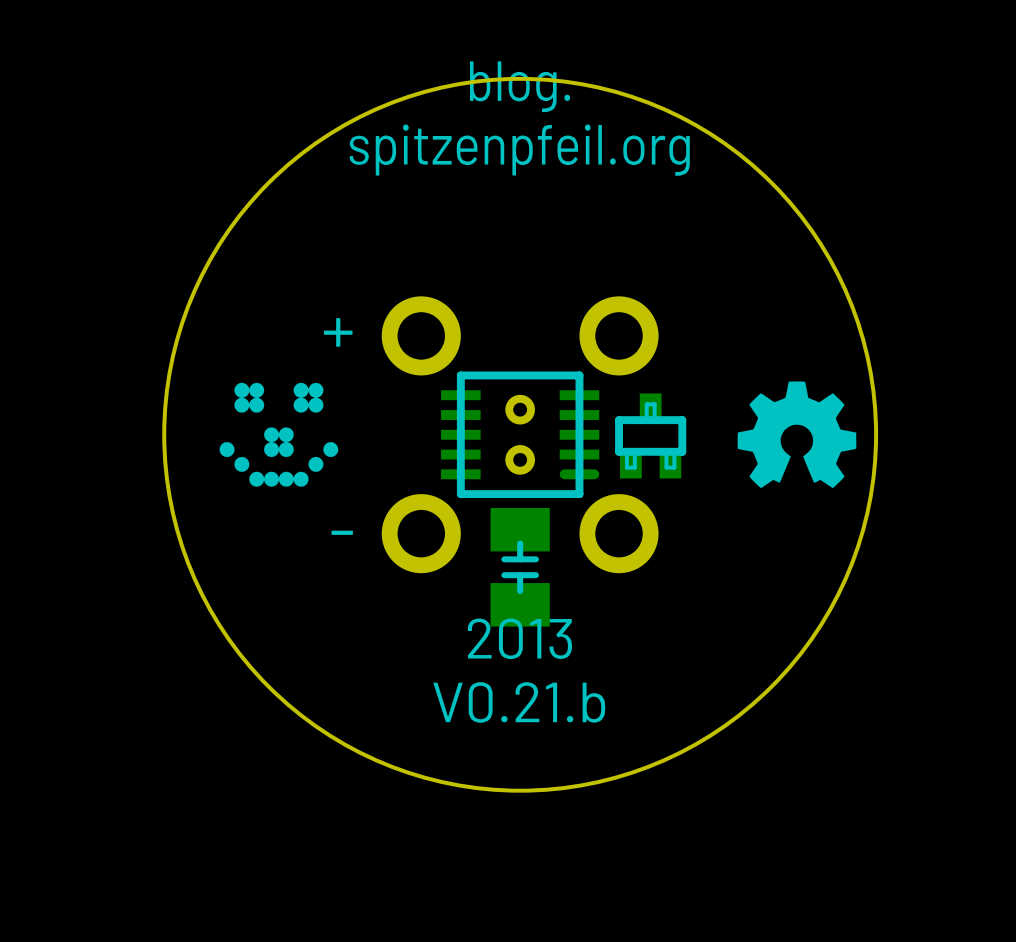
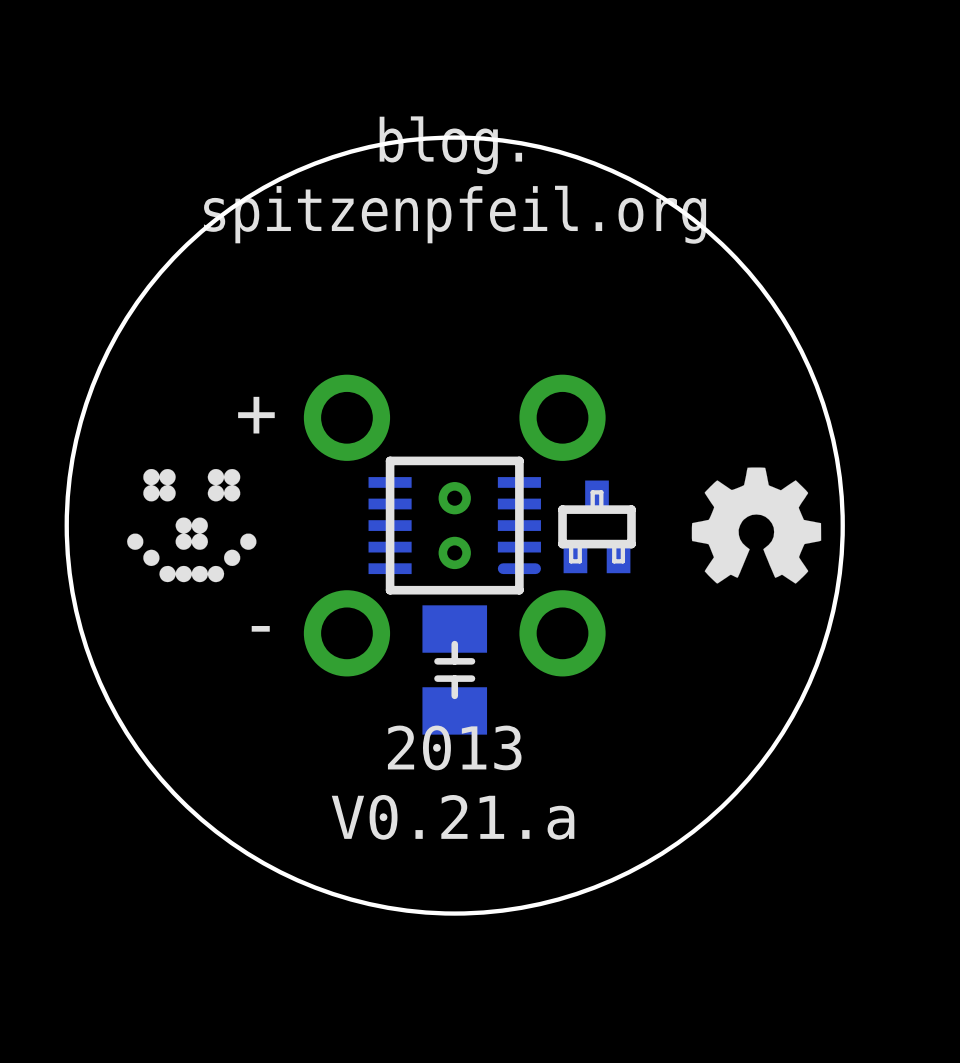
text: V0.21.b (519, 702) -> V0.21.a (453, 817)

